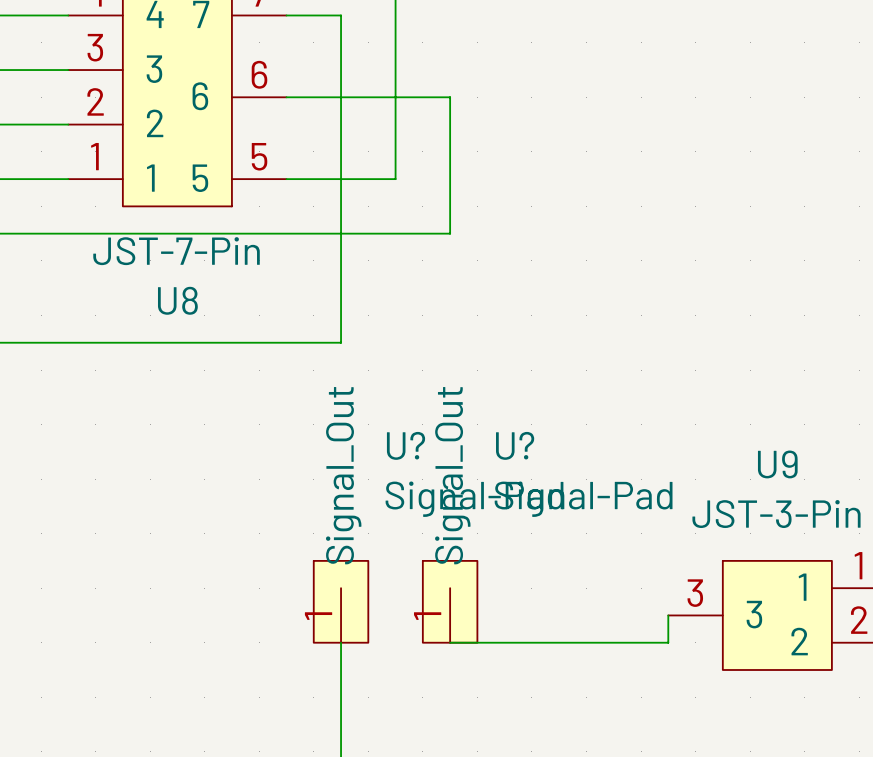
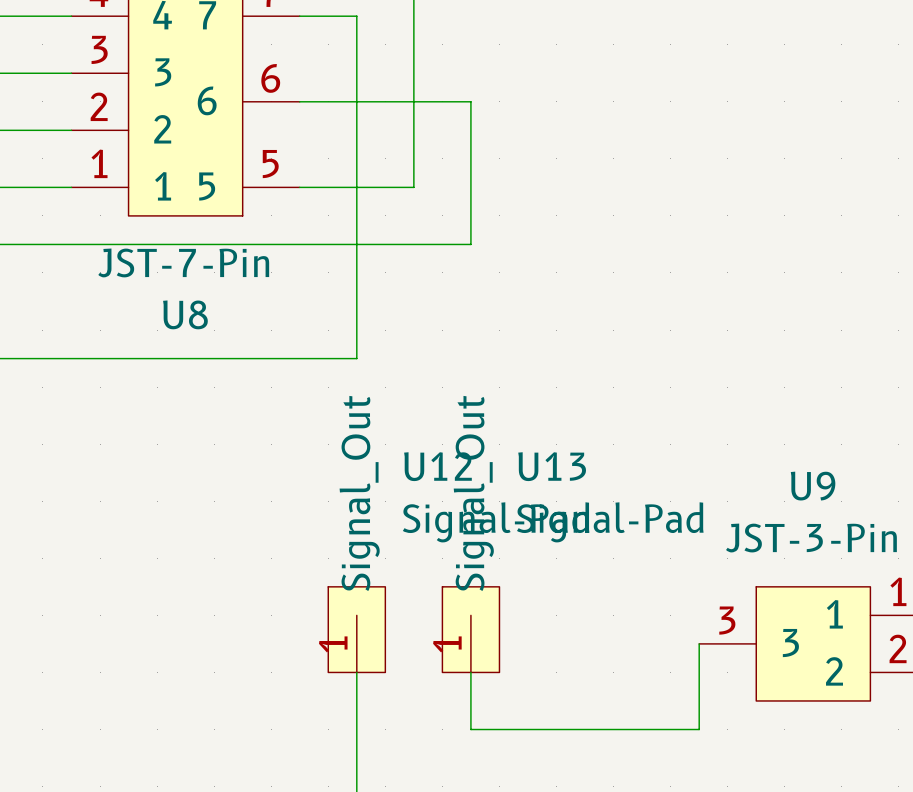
U? name: U? (406, 445) -> U12 (437, 466)
U? name: U? (515, 445) -> U13 (552, 466)
wire: (450, 642) (668, 642) -> (470, 672) (470, 729) (699, 729) (699, 672)

